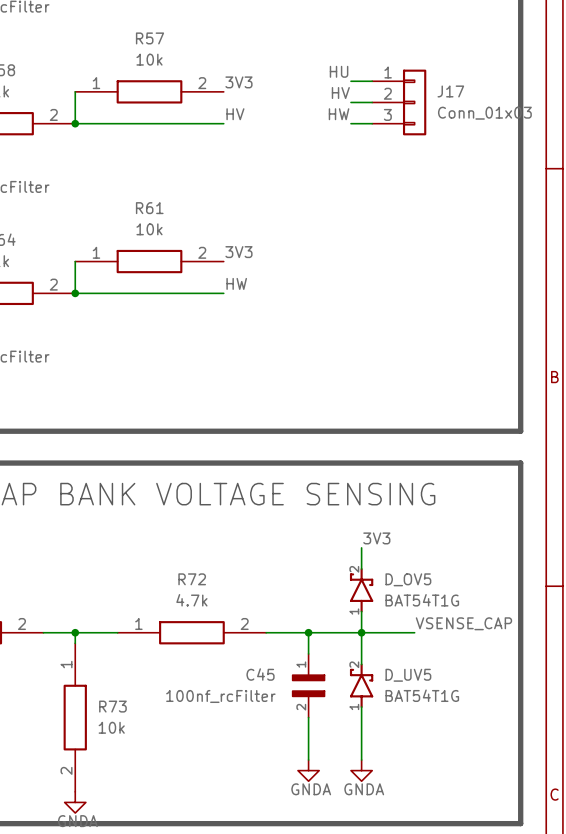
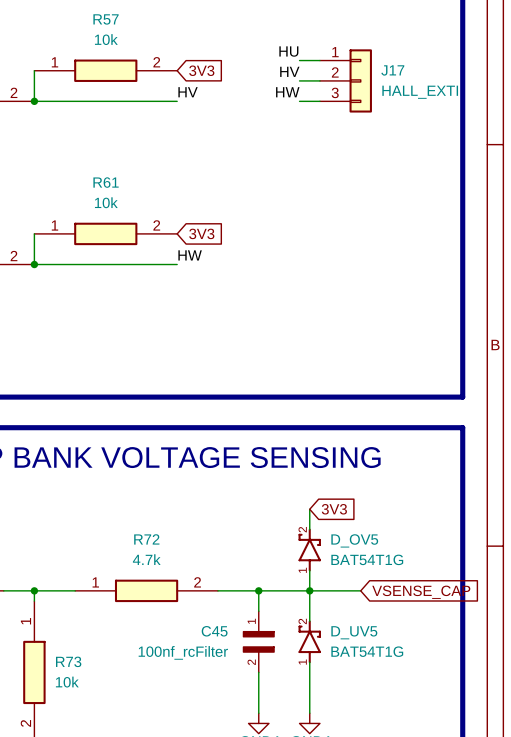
label: 3V3 (238, 82) -> none
global label: none -> 3V3 (201, 70)
J17 value: Conn_01x03 (484, 113) -> HALL_EXTI (420, 92)
label: 3V3 (238, 252) -> none
global label: none -> 3V3 (201, 233)
label: 3V3 (376, 538) -> none
global label: none -> 3V3 (334, 509)
label: VSENSE_CAP (463, 623) -> none
global label: none -> VSENSE_CAP (421, 592)

